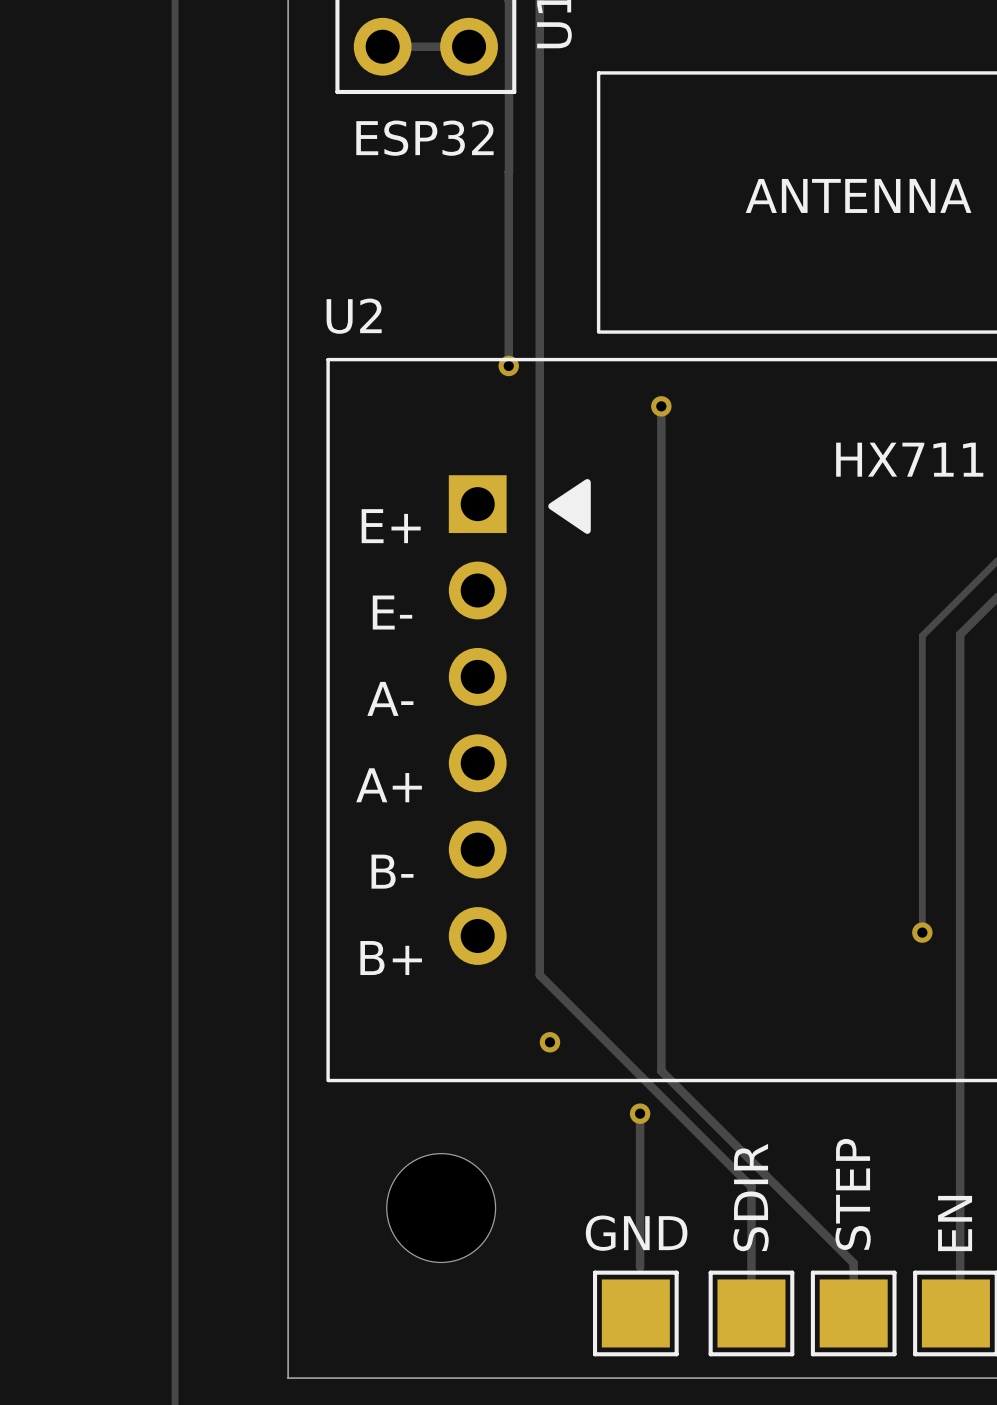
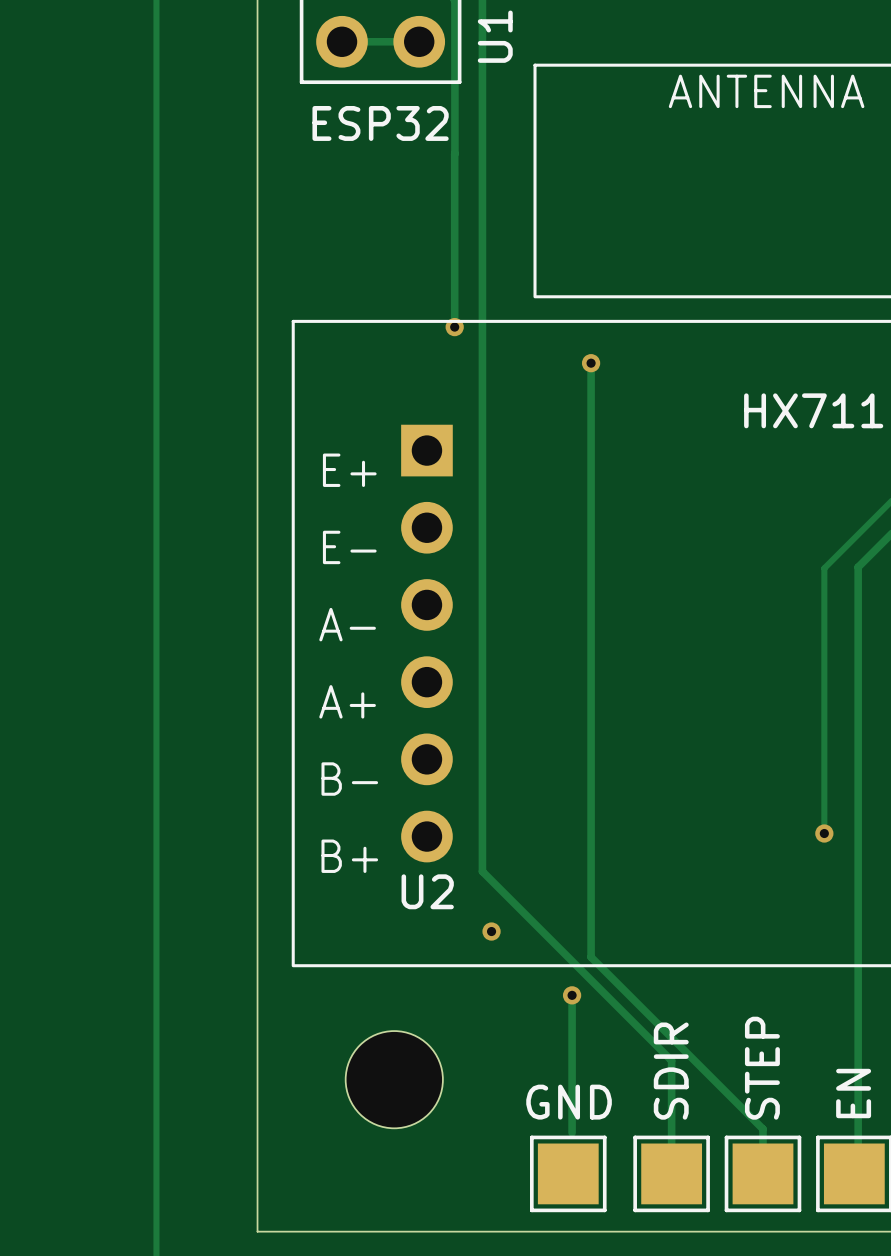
part text position: ANTENNA (858, 195) -> ANTENNA (766, 91)
U2 name position: U2 (354, 316) -> U2 (427, 891)
drawing: [548, 479, 591, 534] -> none

